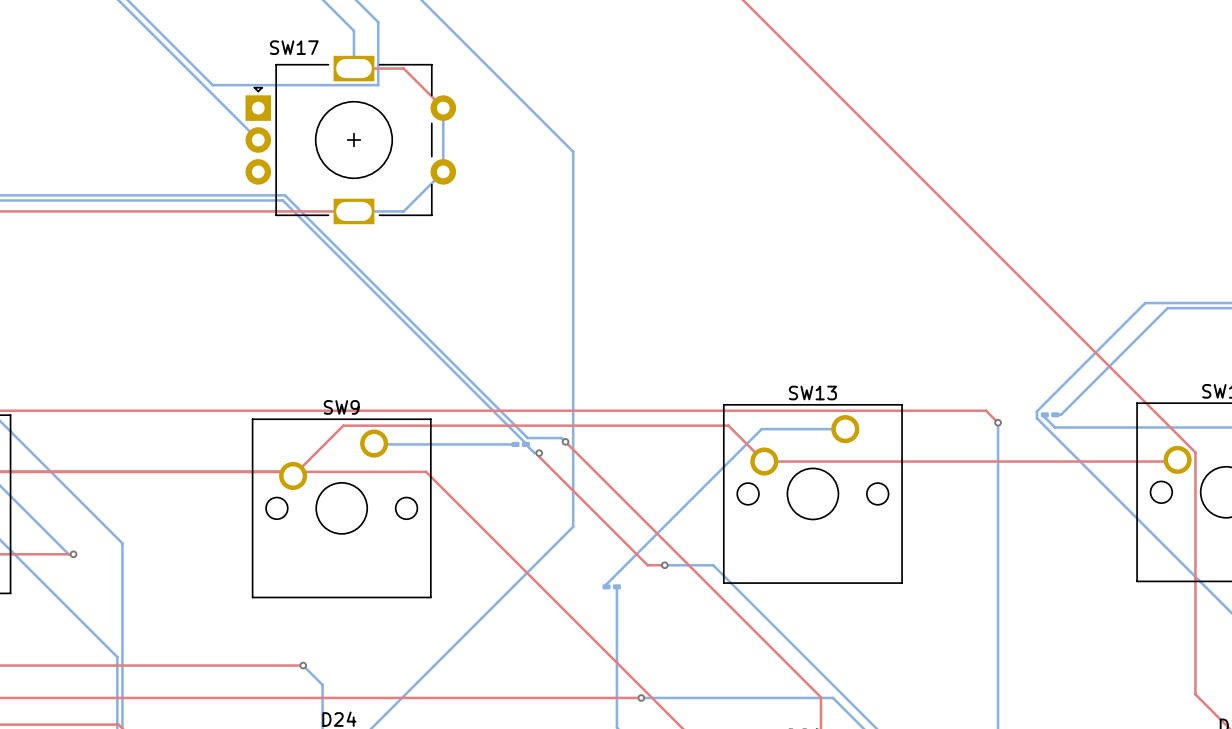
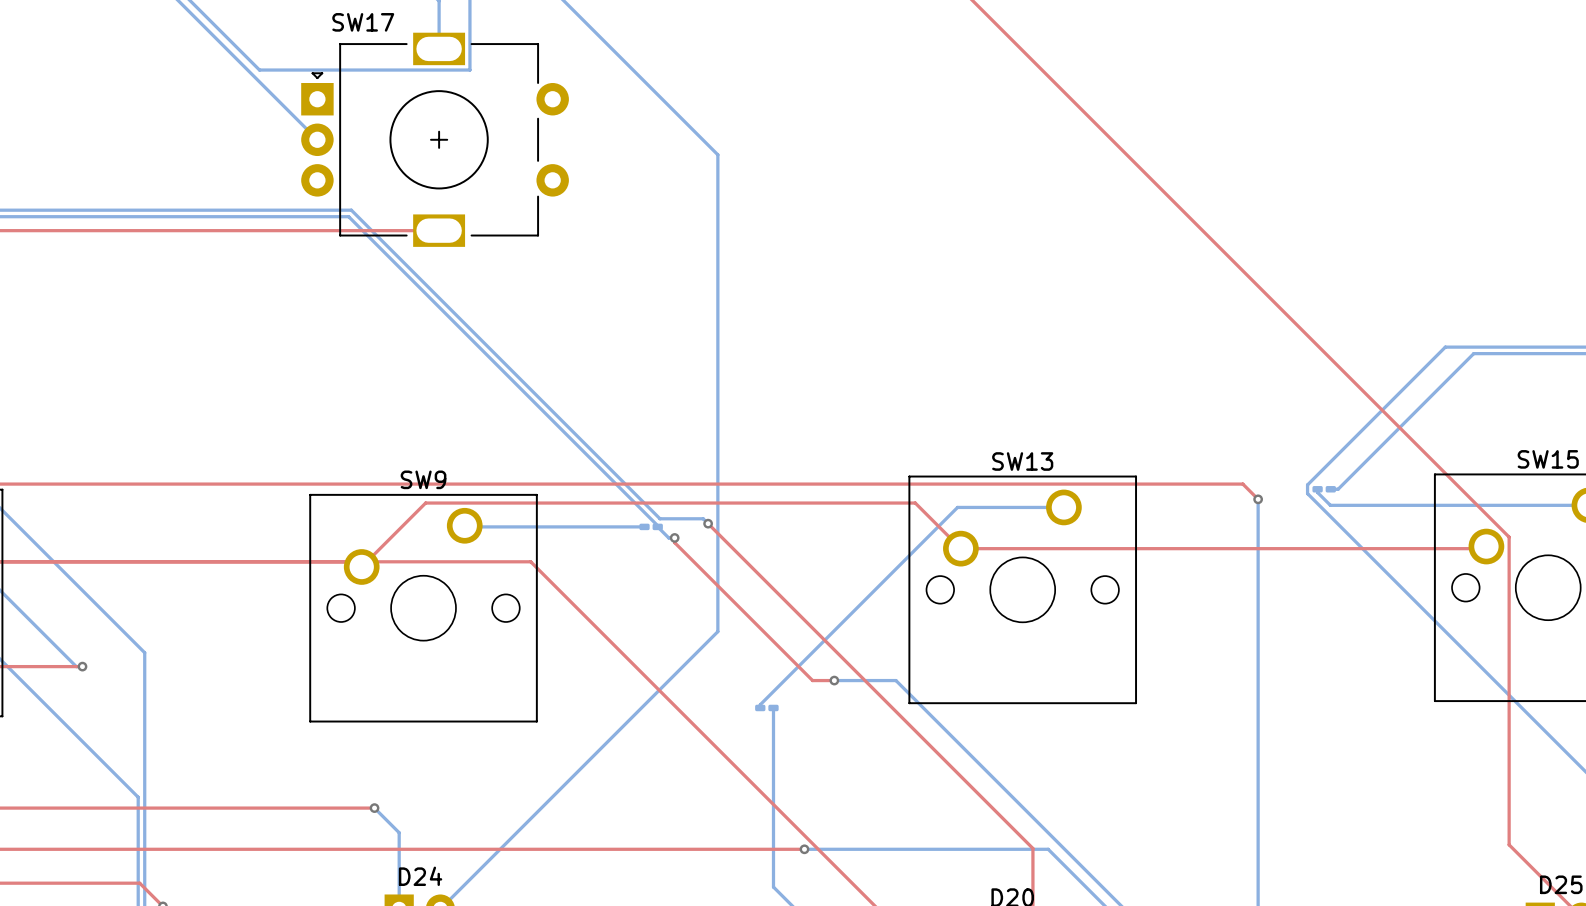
top track: (353, 68) (403, 68) (443, 108) -> none
bottom track: (443, 108) (443, 171) (403, 211) (353, 211) -> none

